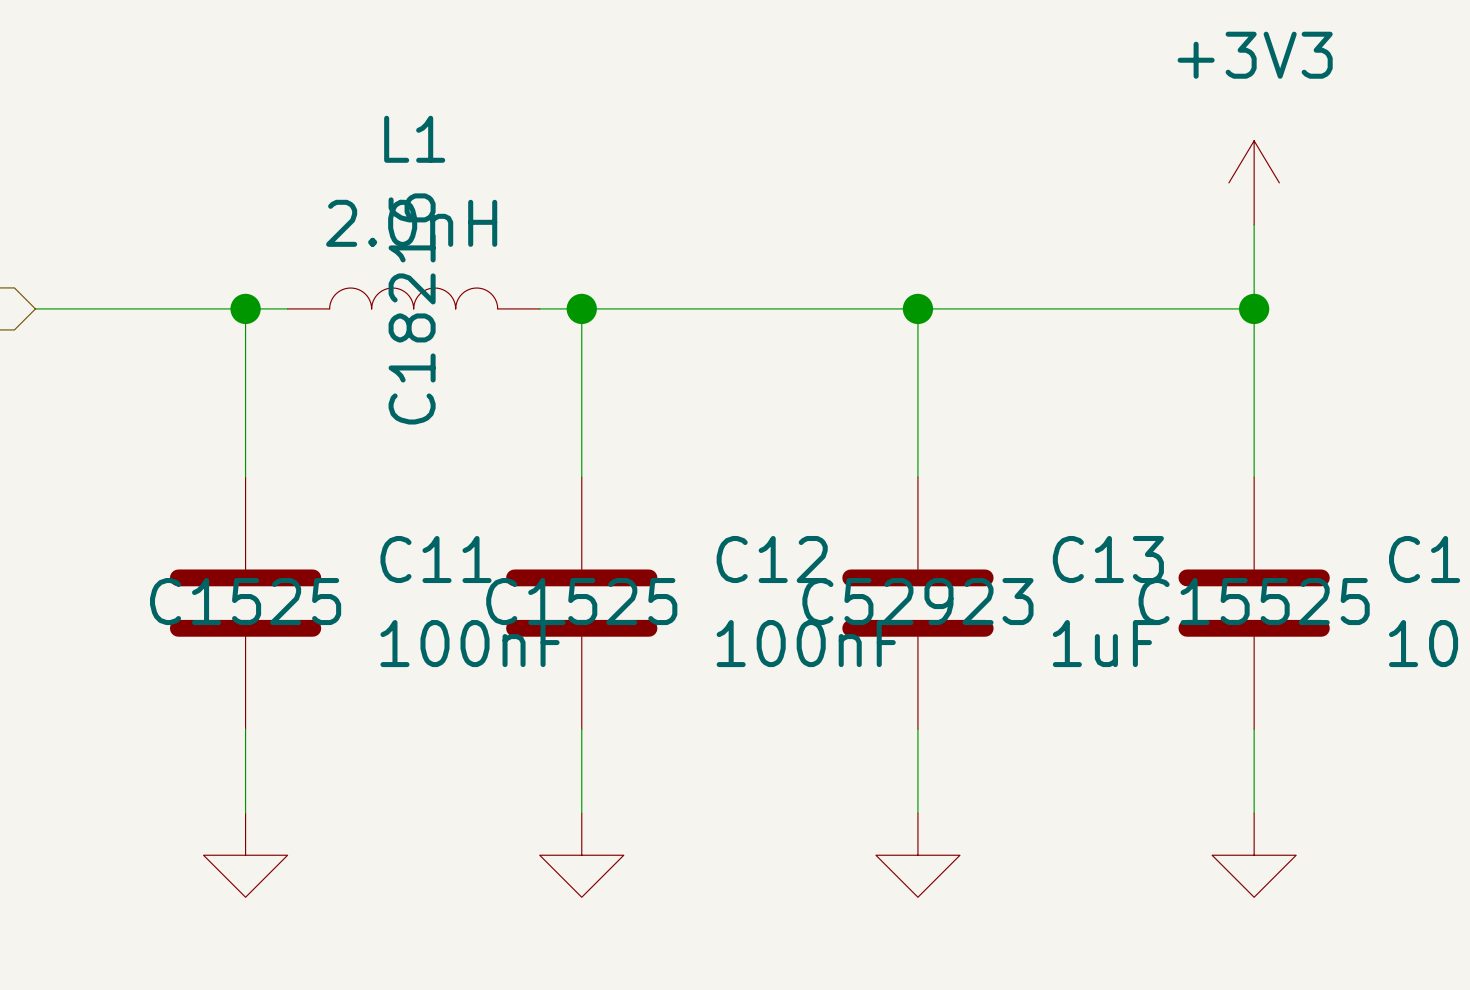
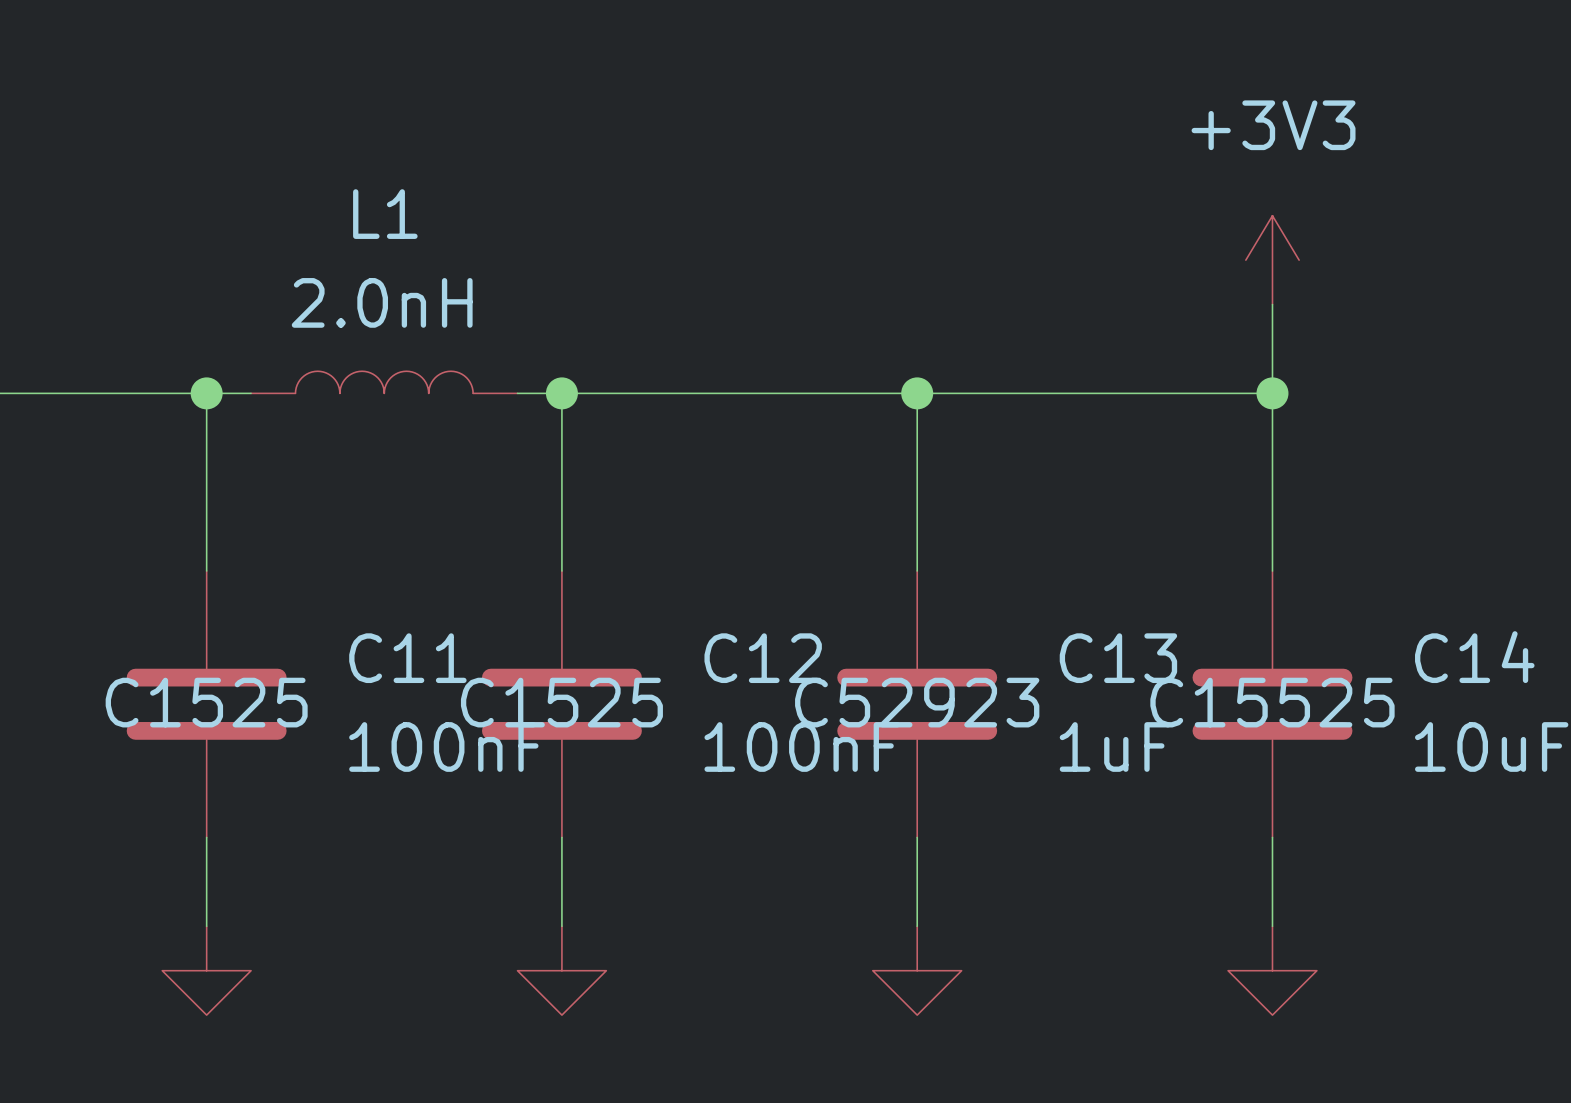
L1 text: C18216 (412, 308) -> none

